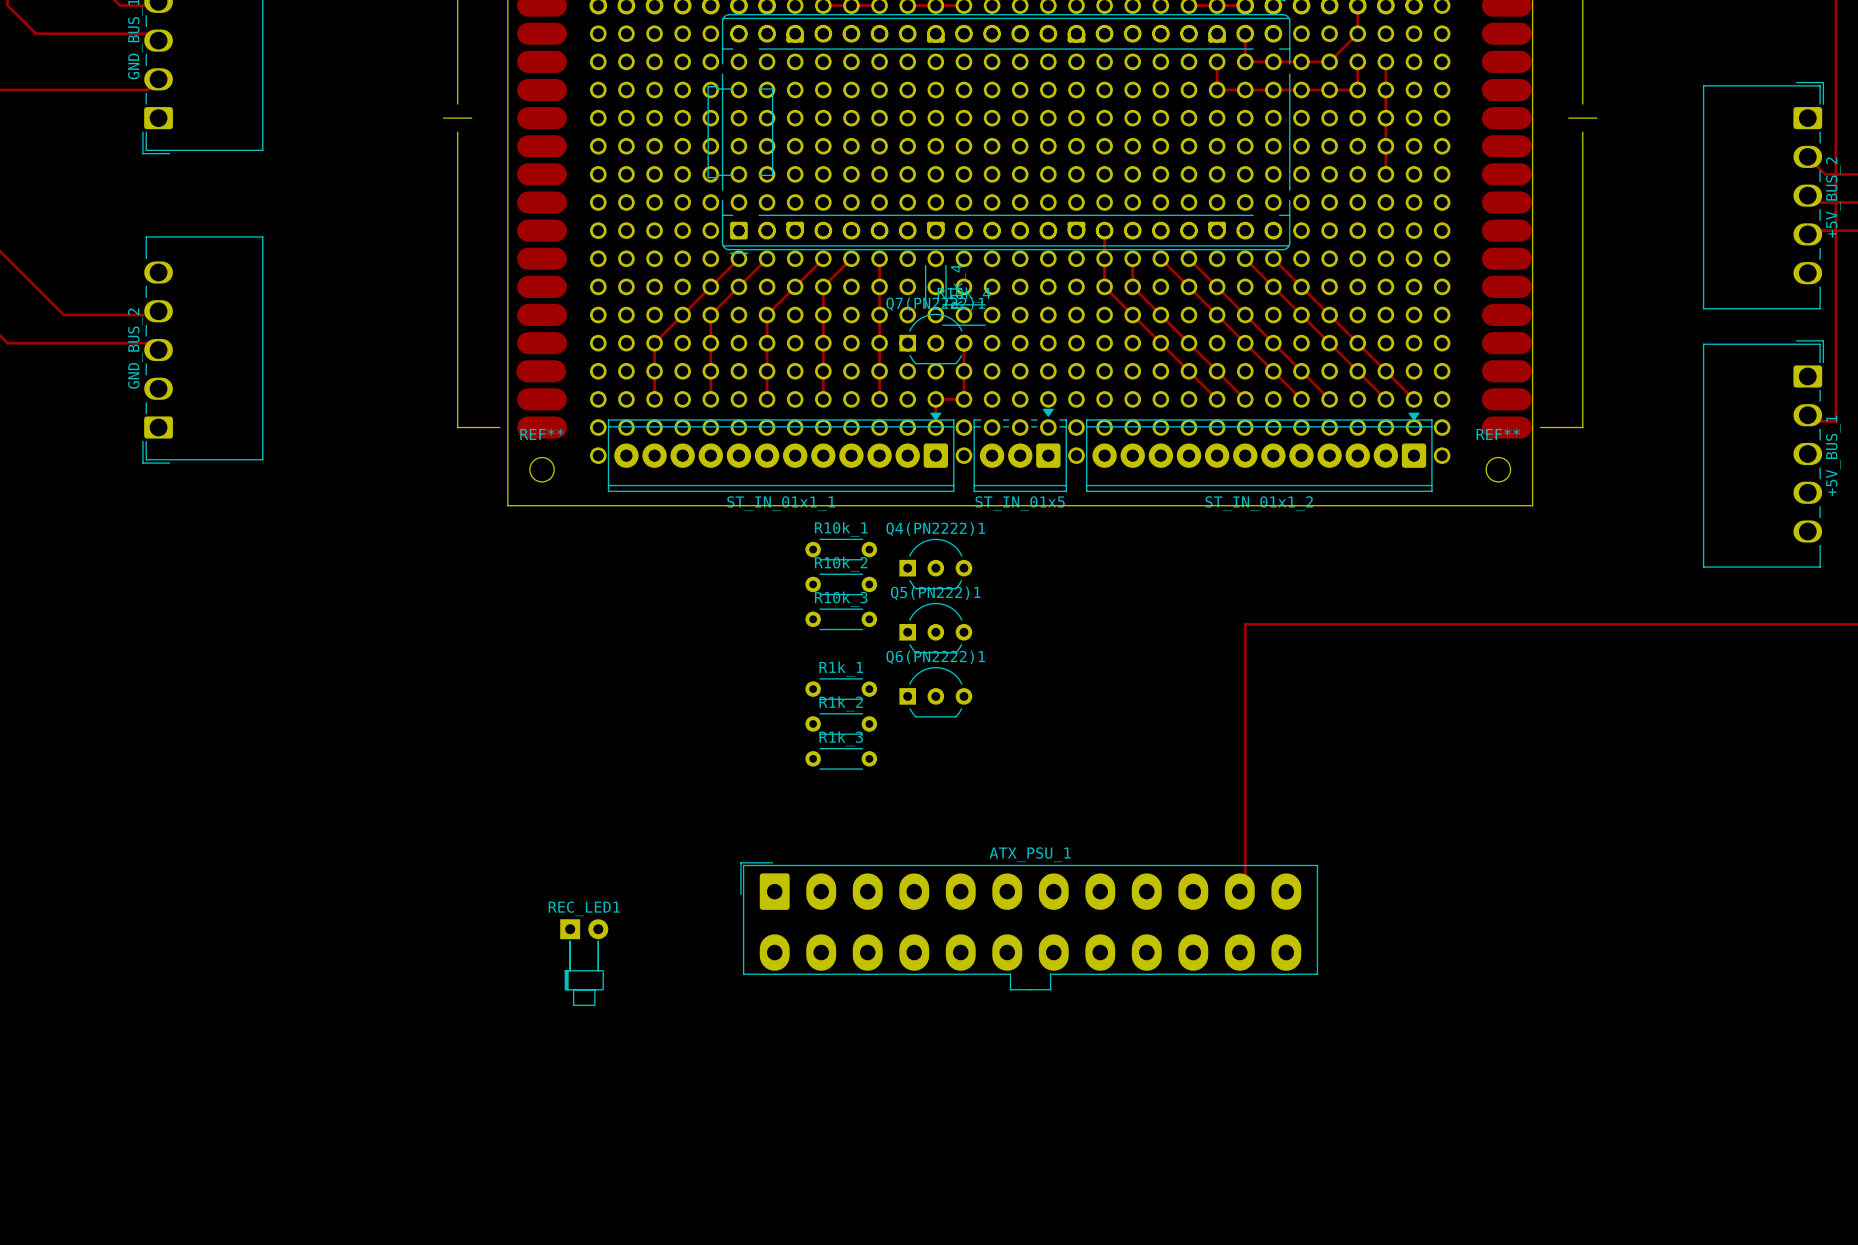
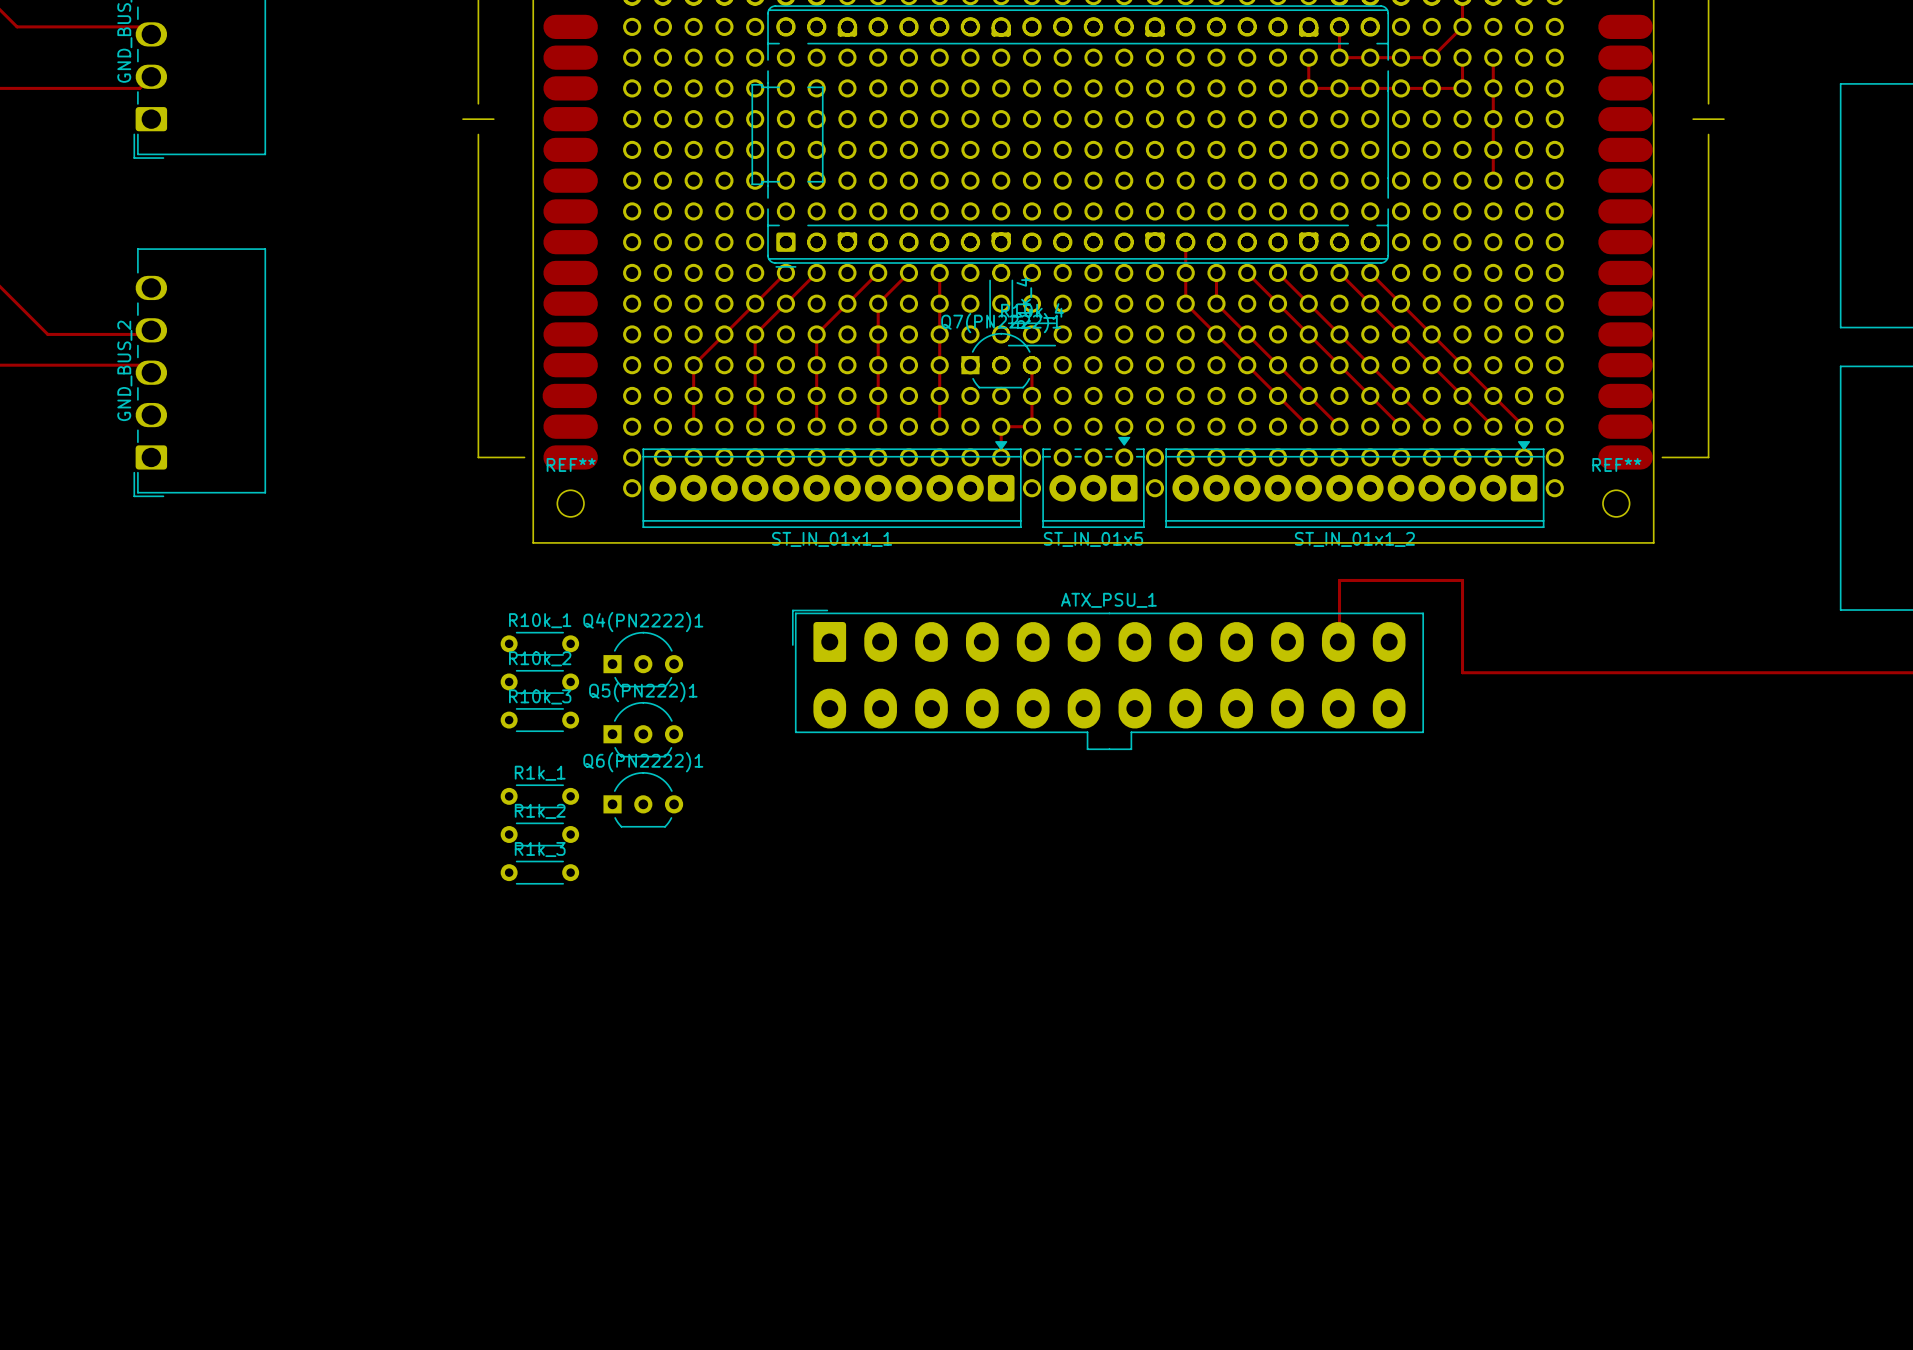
R10k_1 position: (841, 549) -> (539, 643)
Q4(PN2222)1 position: (935, 564) -> (643, 659)
R10k_2 position: (841, 584) -> (539, 681)
R10k_3 position: (841, 619) -> (539, 720)
track: (1357, 624) (1245, 624) (1245, 886) (1239, 891) -> (1462, 672) (1462, 580) (1339, 580) (1338, 641)
Q5(PN222)1 position: (935, 628) -> (643, 729)
R1k_1 position: (841, 689) -> (539, 796)
Q6(PN2222)1 position: (935, 692) -> (643, 799)
R1k_2 position: (841, 723) -> (539, 834)
R1k_3 position: (841, 758) -> (539, 872)
ATX_PSU_1 position: (1029, 926) -> (1108, 679)
REC_LED1: (584, 962) -> none

